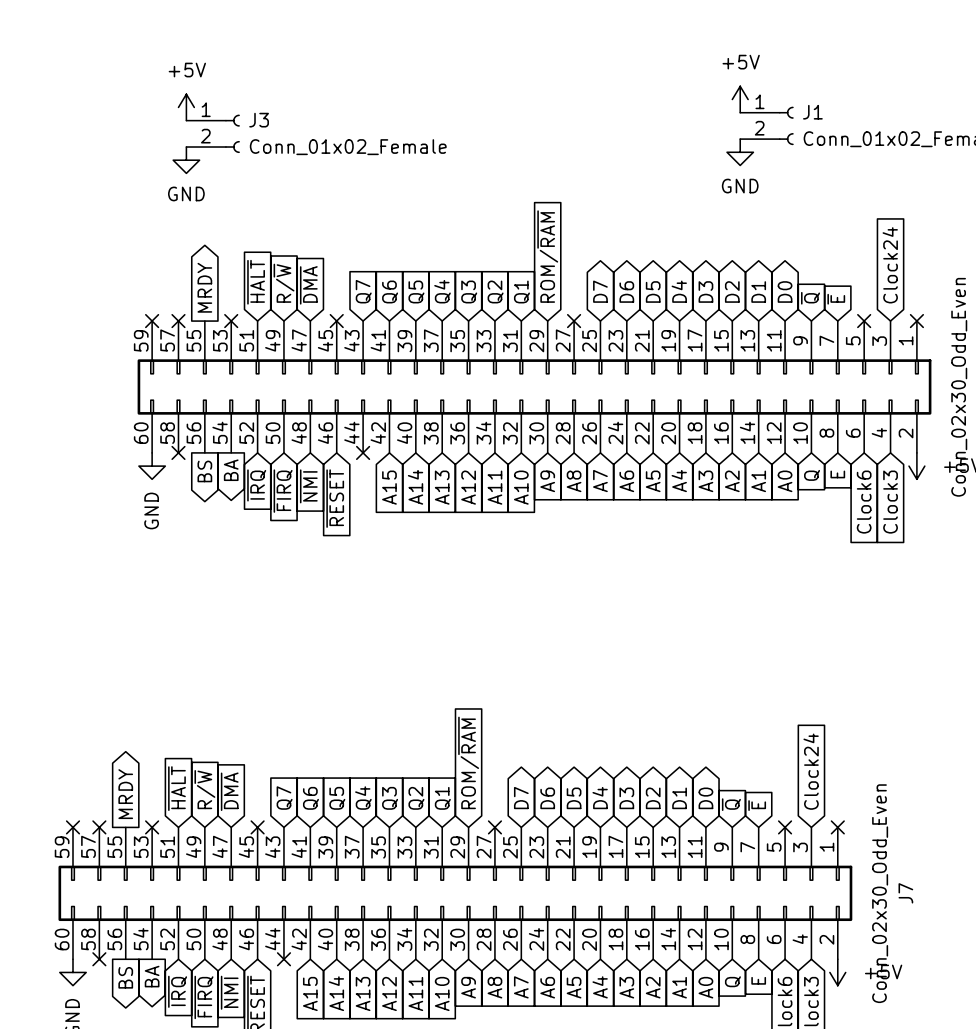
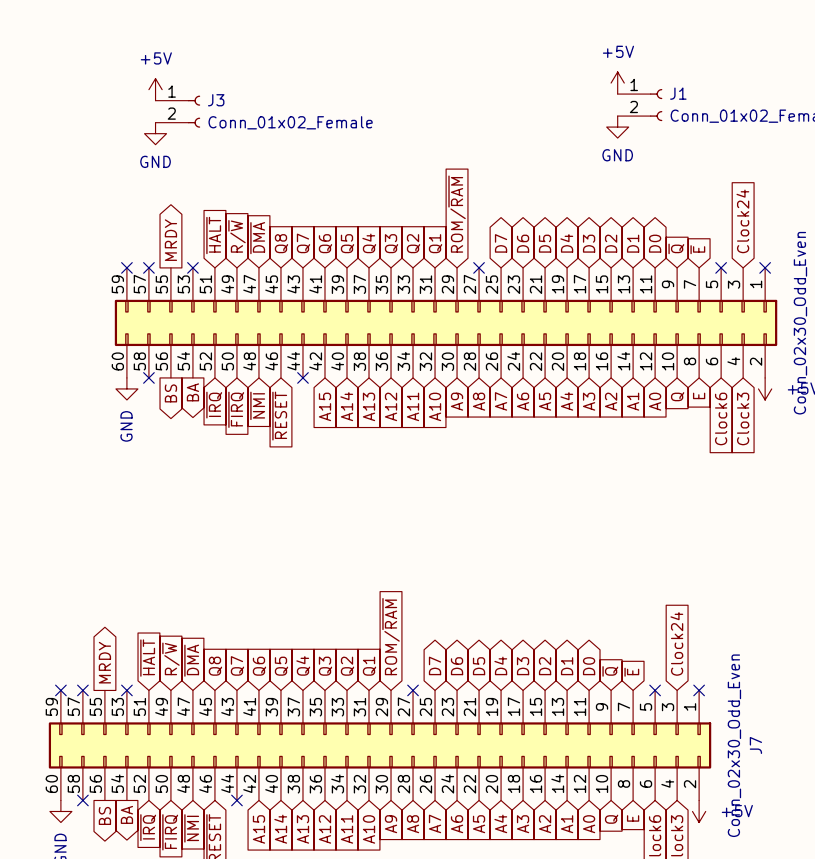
global label: none -> Q8 (281, 243)
no-connect mark: (336, 321) -> none
global label: none -> Q8 (215, 666)
no-connect mark: (257, 827) -> none

